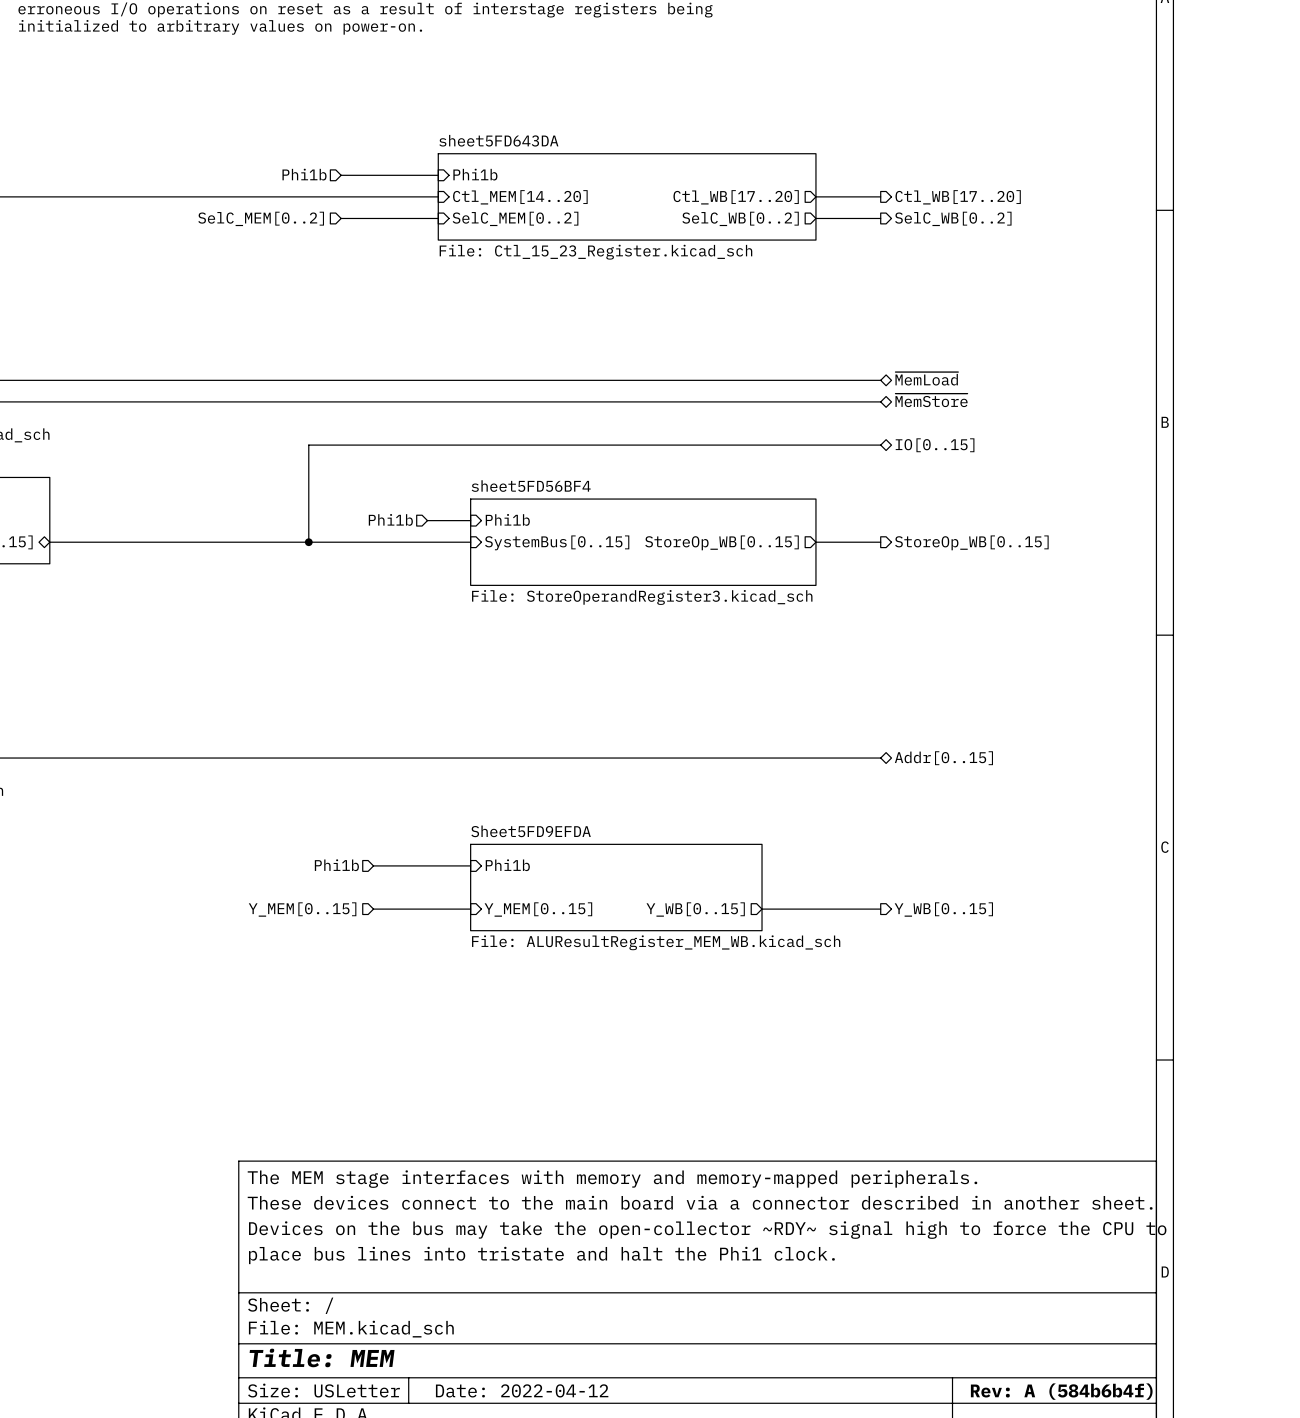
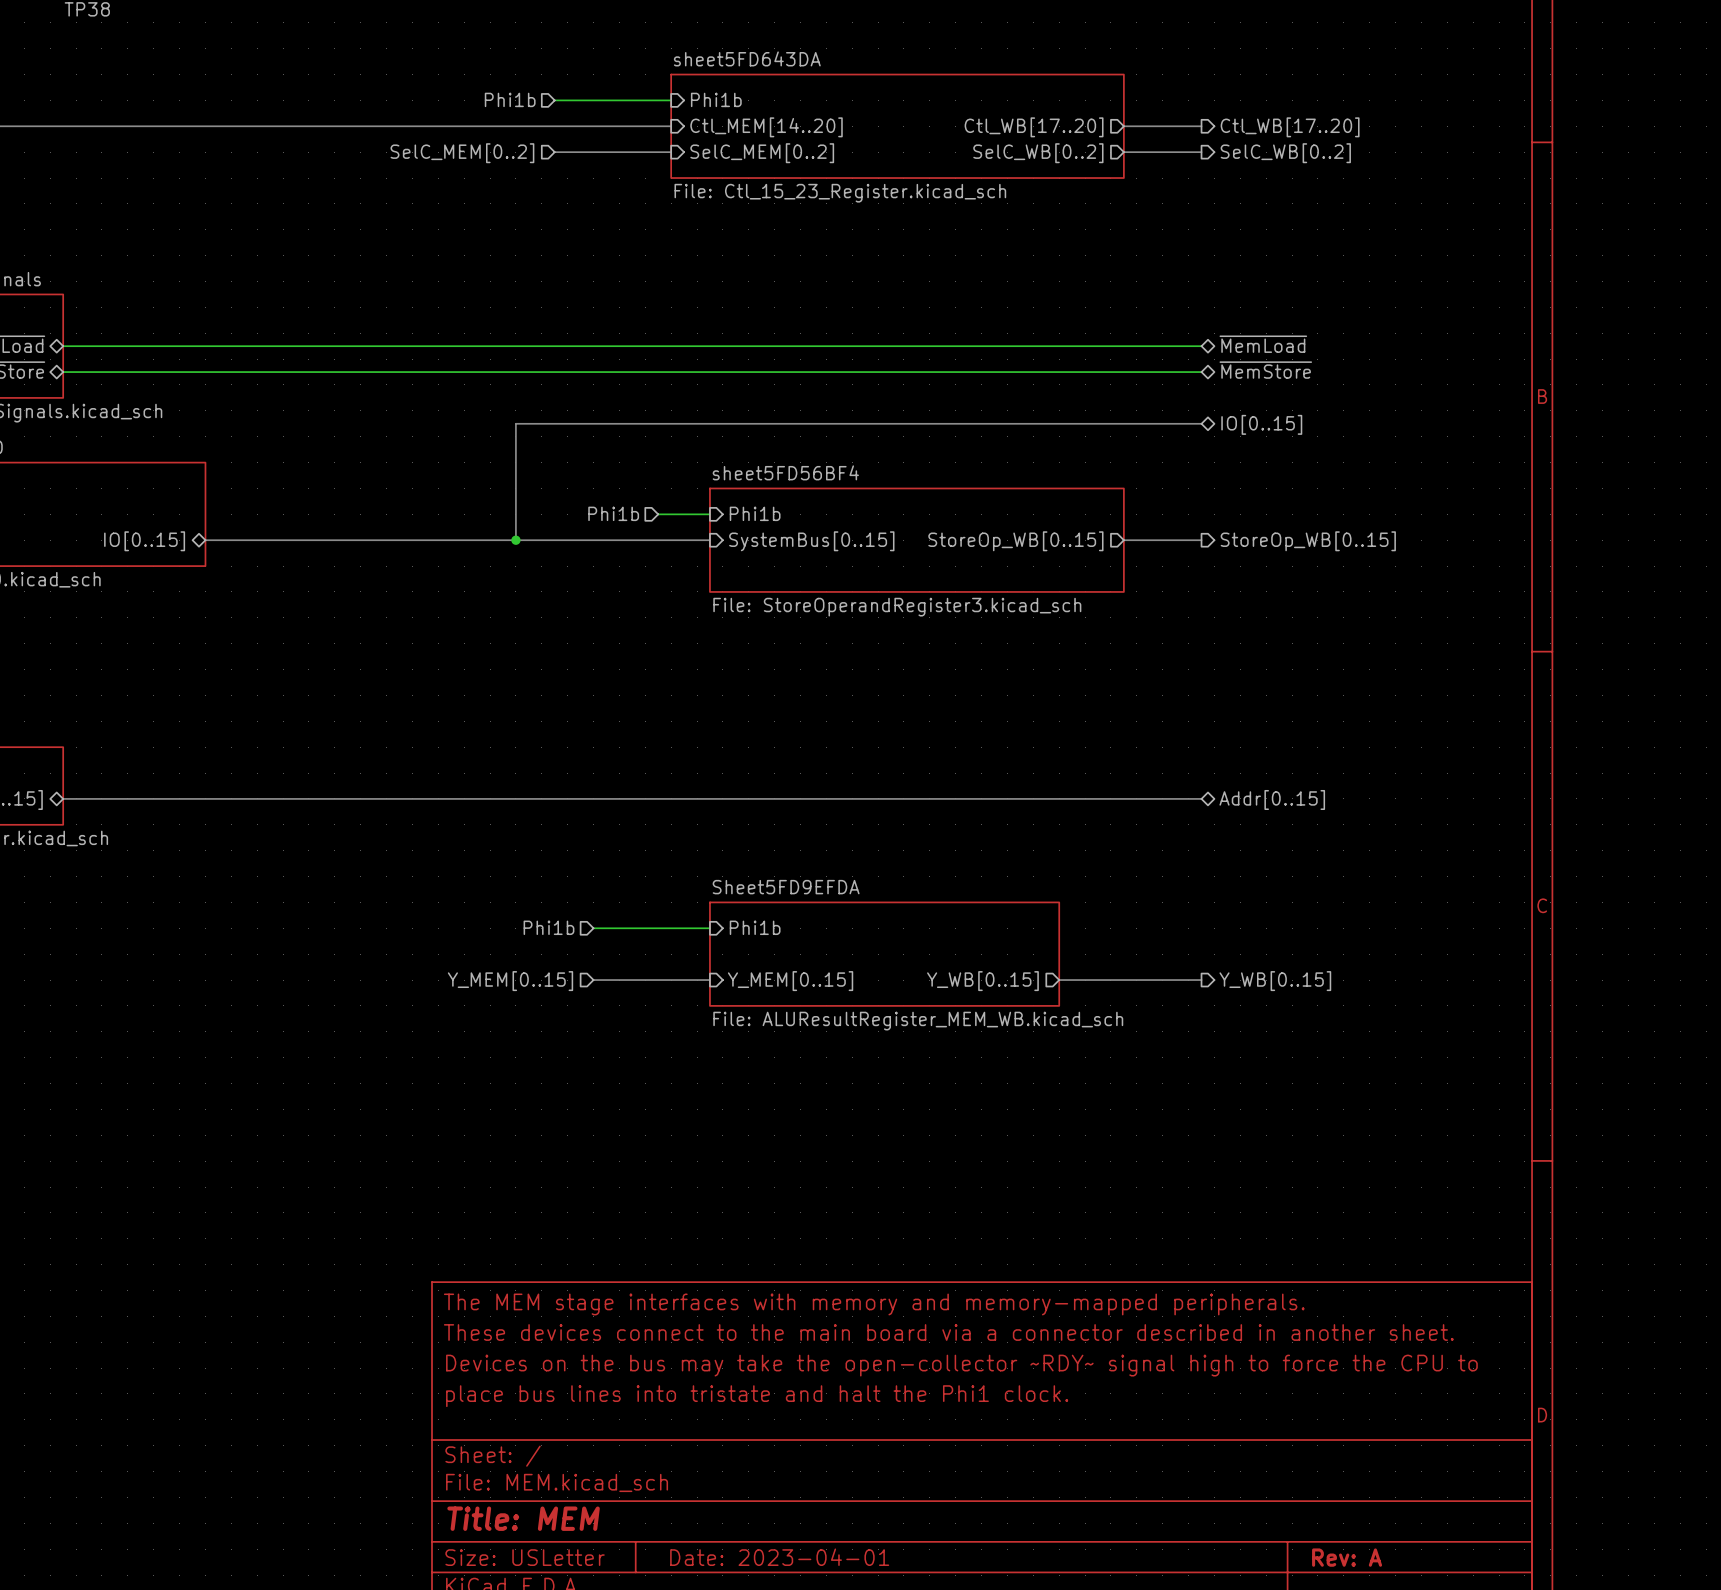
title block: Date: 2022-04-12 (522, 1390) -> Date: 2023-04-01 (779, 1557)
title block: Rev: A (584b6b4f) (1061, 1391) -> Rev: A (1347, 1557)

